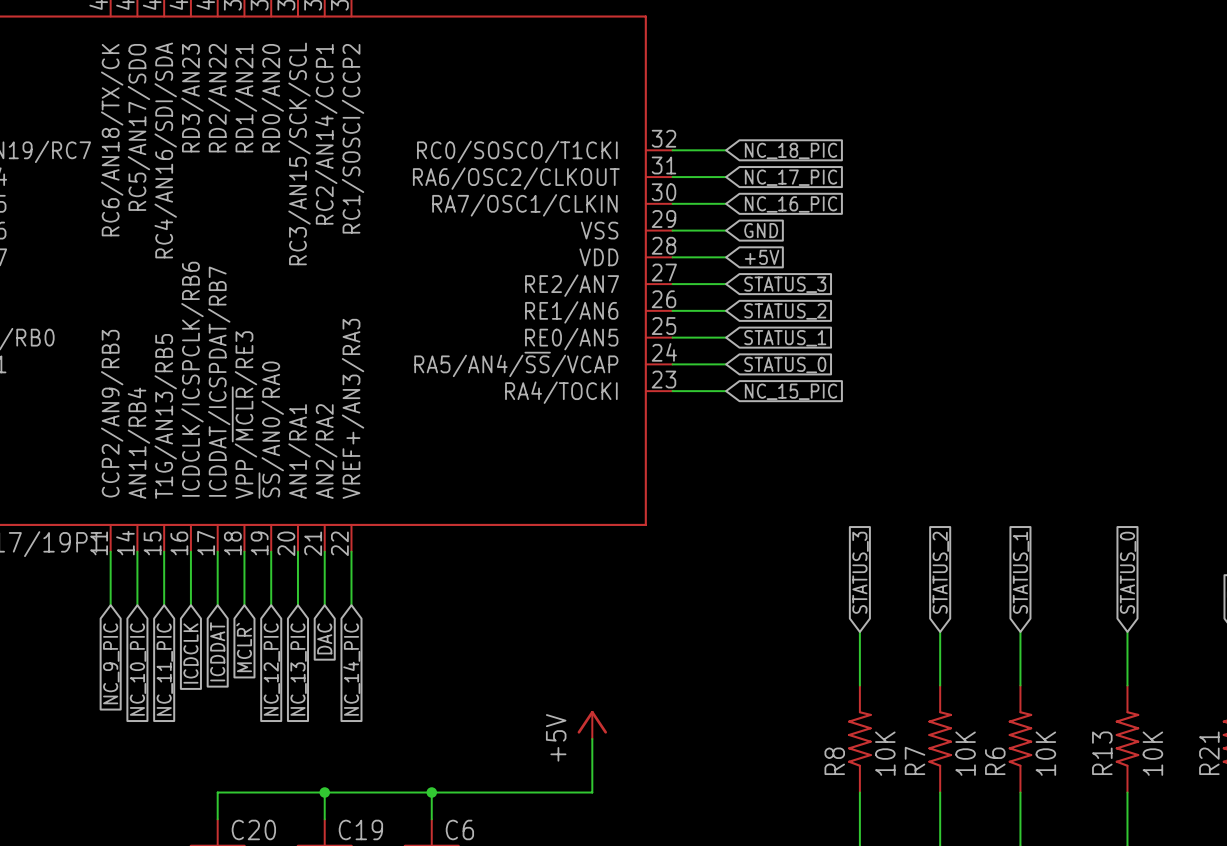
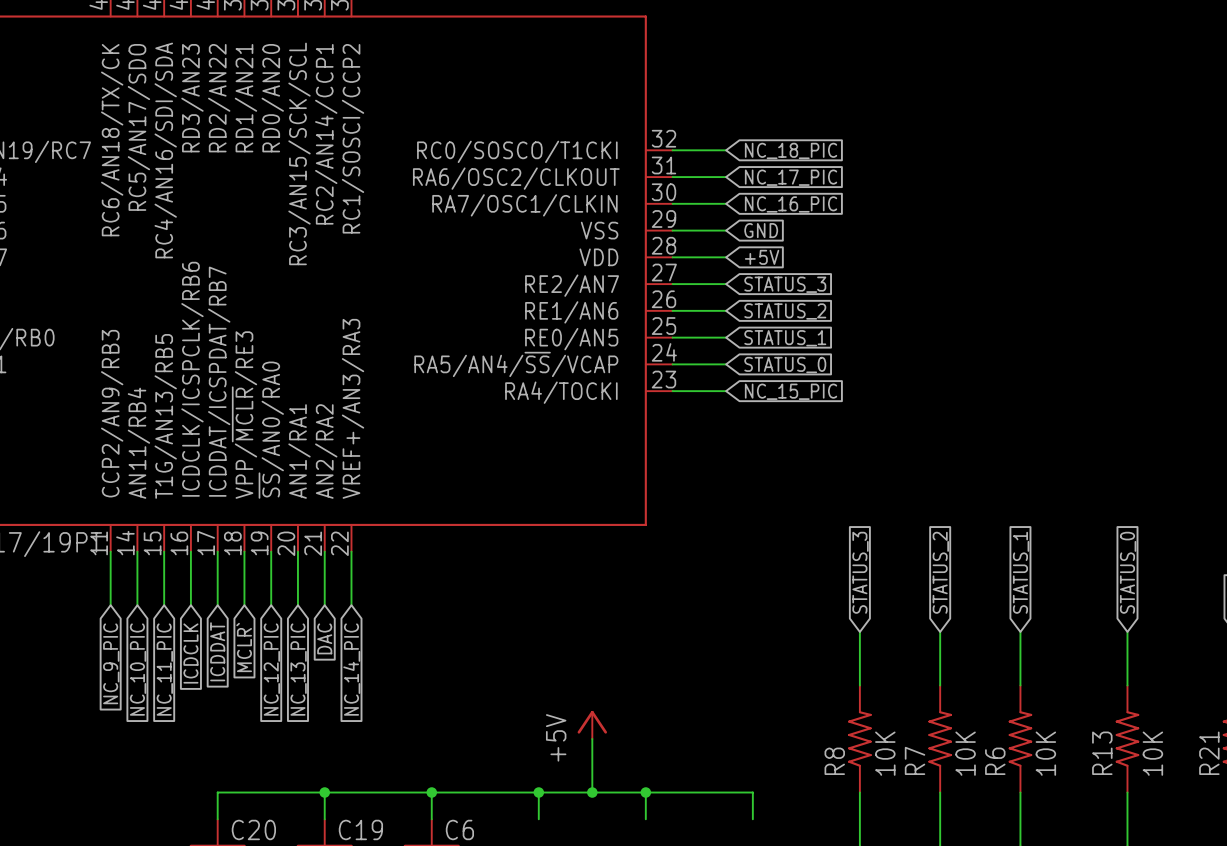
wire: none -> (538, 792) (538, 819)
junction: none -> (538, 792)
wire: none -> (592, 792) (752, 792) (752, 819)
junction: none -> (592, 792)
wire: none -> (645, 792) (645, 819)
junction: none -> (645, 792)

